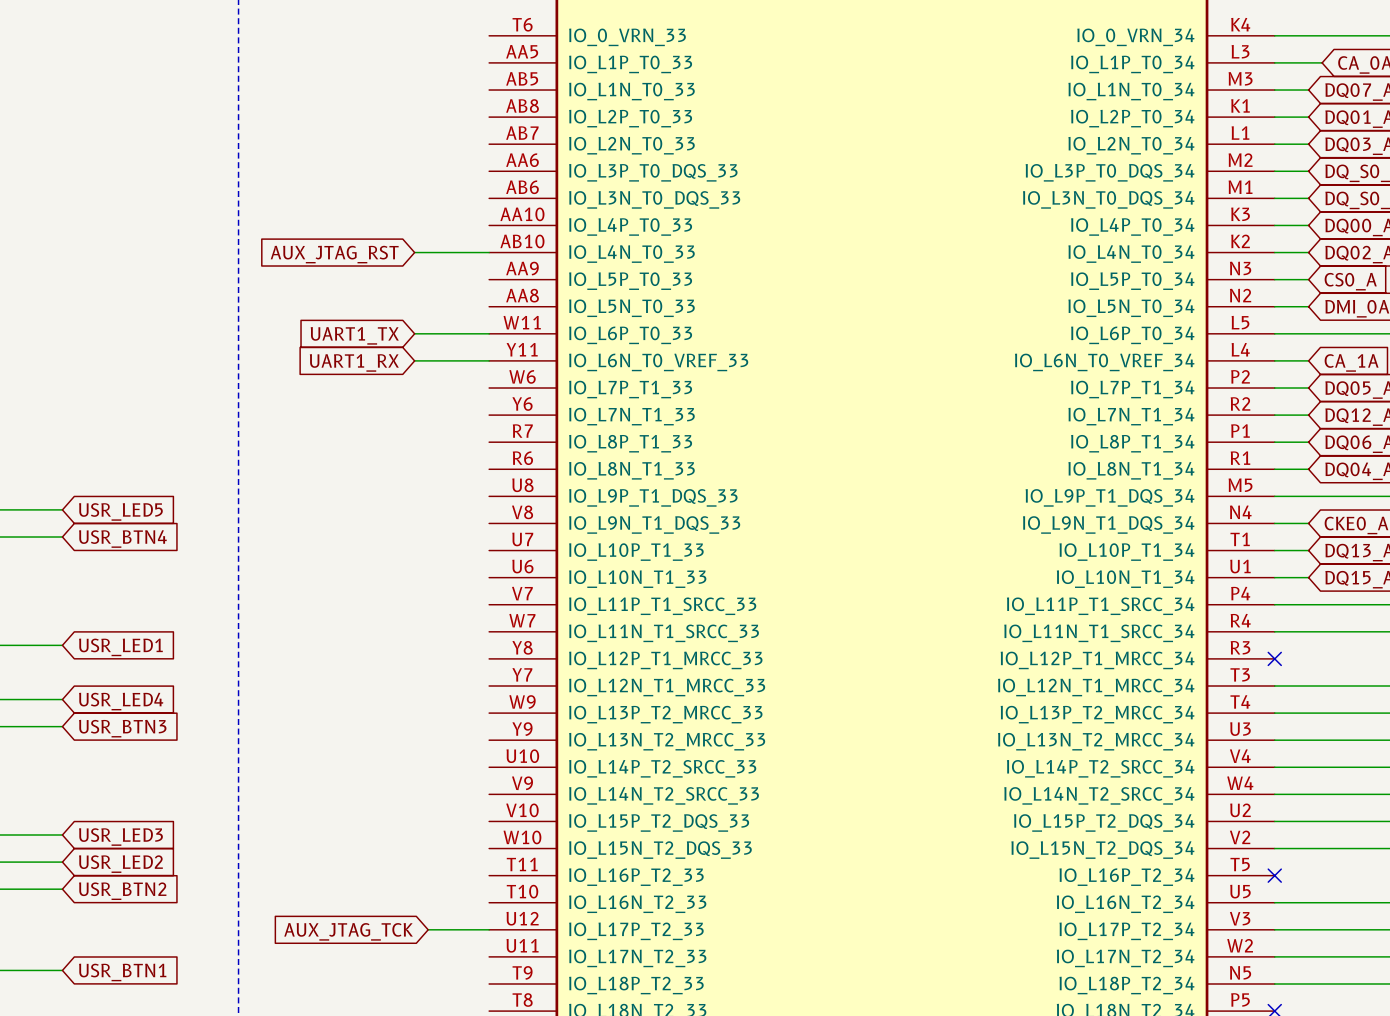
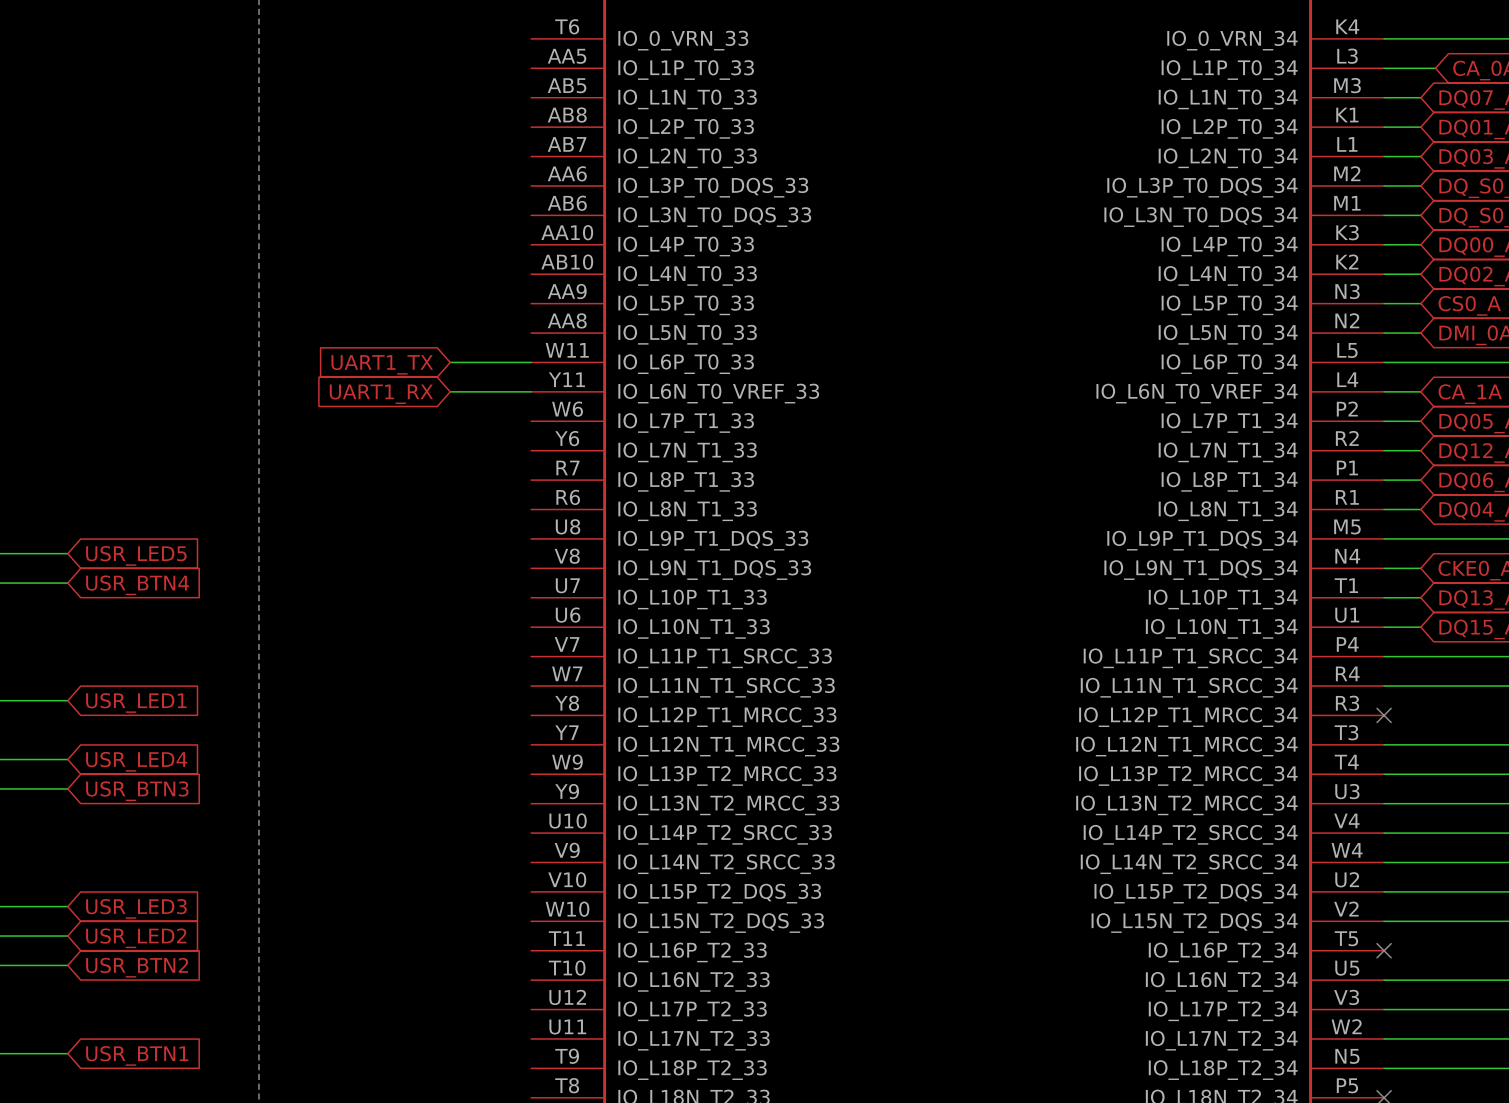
wire: (414, 252) (489, 252) -> none
global label: AUX_JTAG_RST (334, 254) -> none
wire: (428, 929) (489, 929) -> none
global label: AUX_JTAG_TCK (348, 931) -> none

